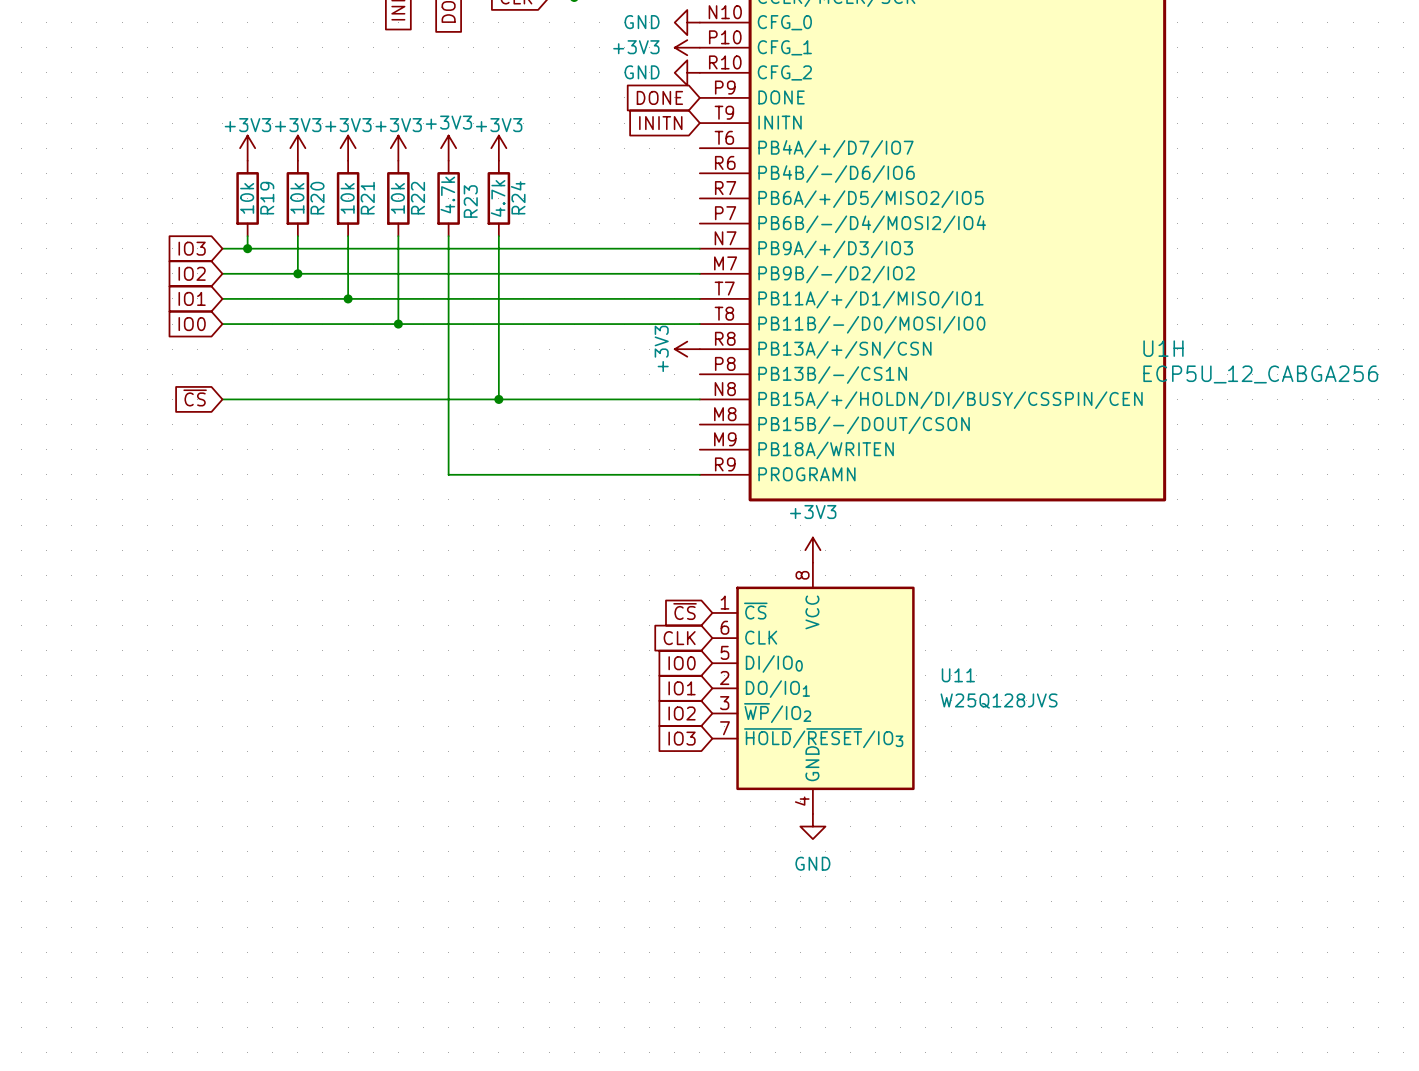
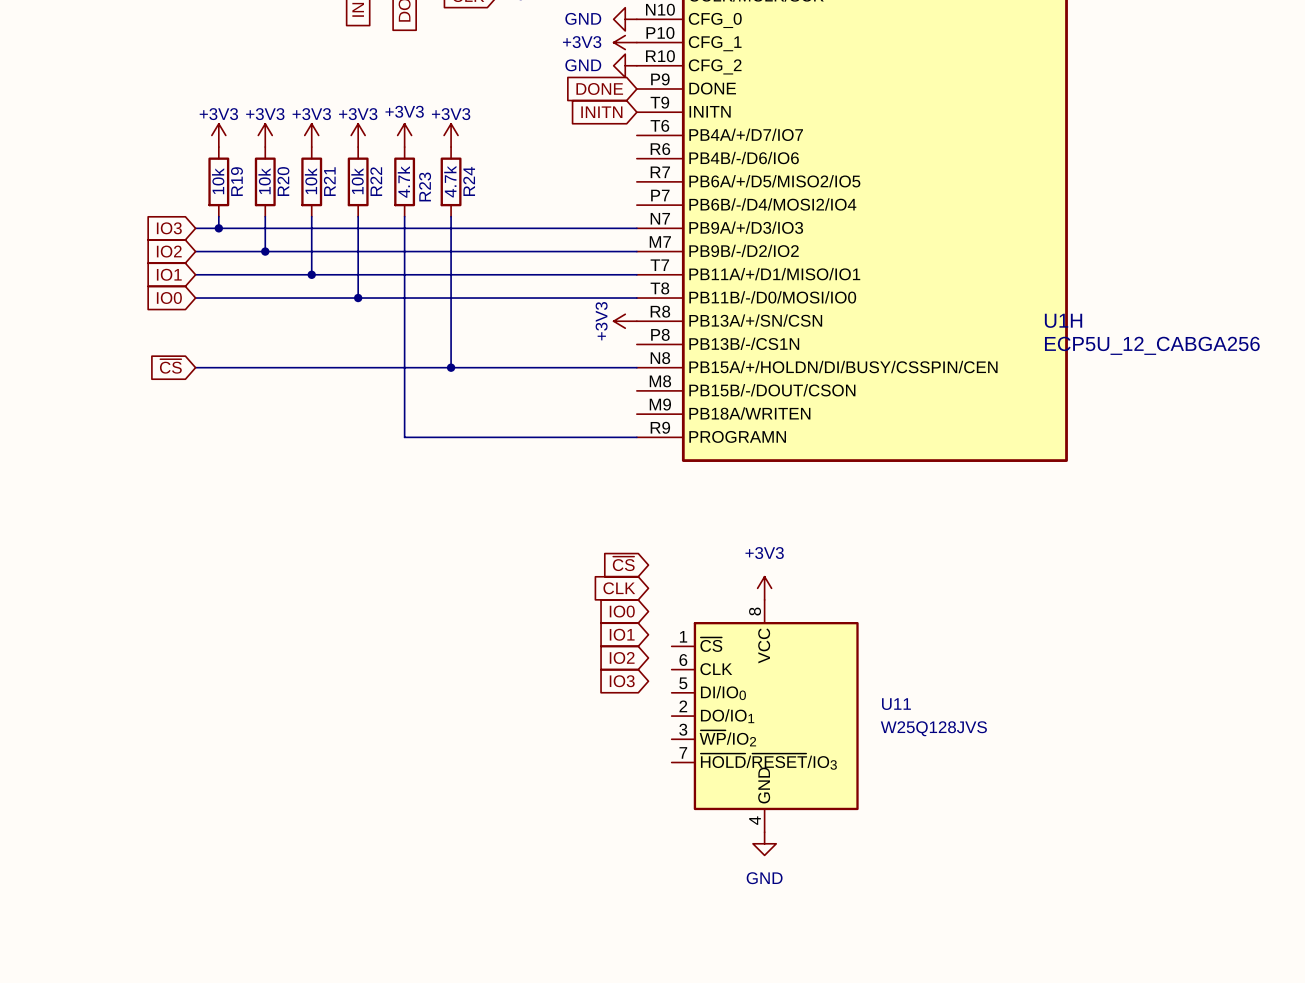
power symbol position: +3V3 (812, 550) -> +3V3 (764, 588)
U11 position: (813, 688) -> (765, 716)
power symbol position: GND (812, 826) -> GND (764, 843)

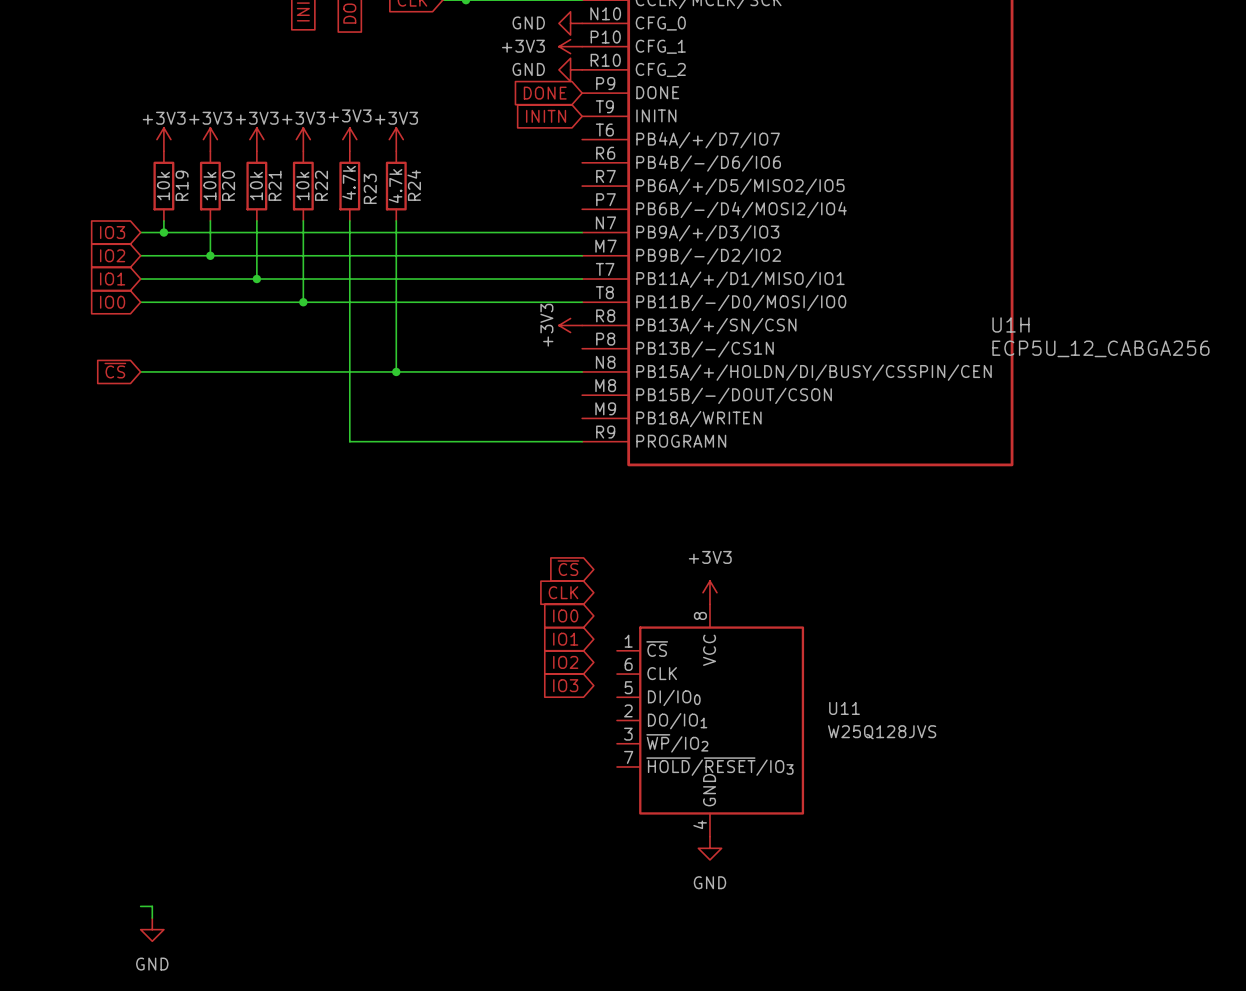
wire: none -> (140, 906) (152, 906) (152, 918)
power symbol: none -> GND (152, 929)

